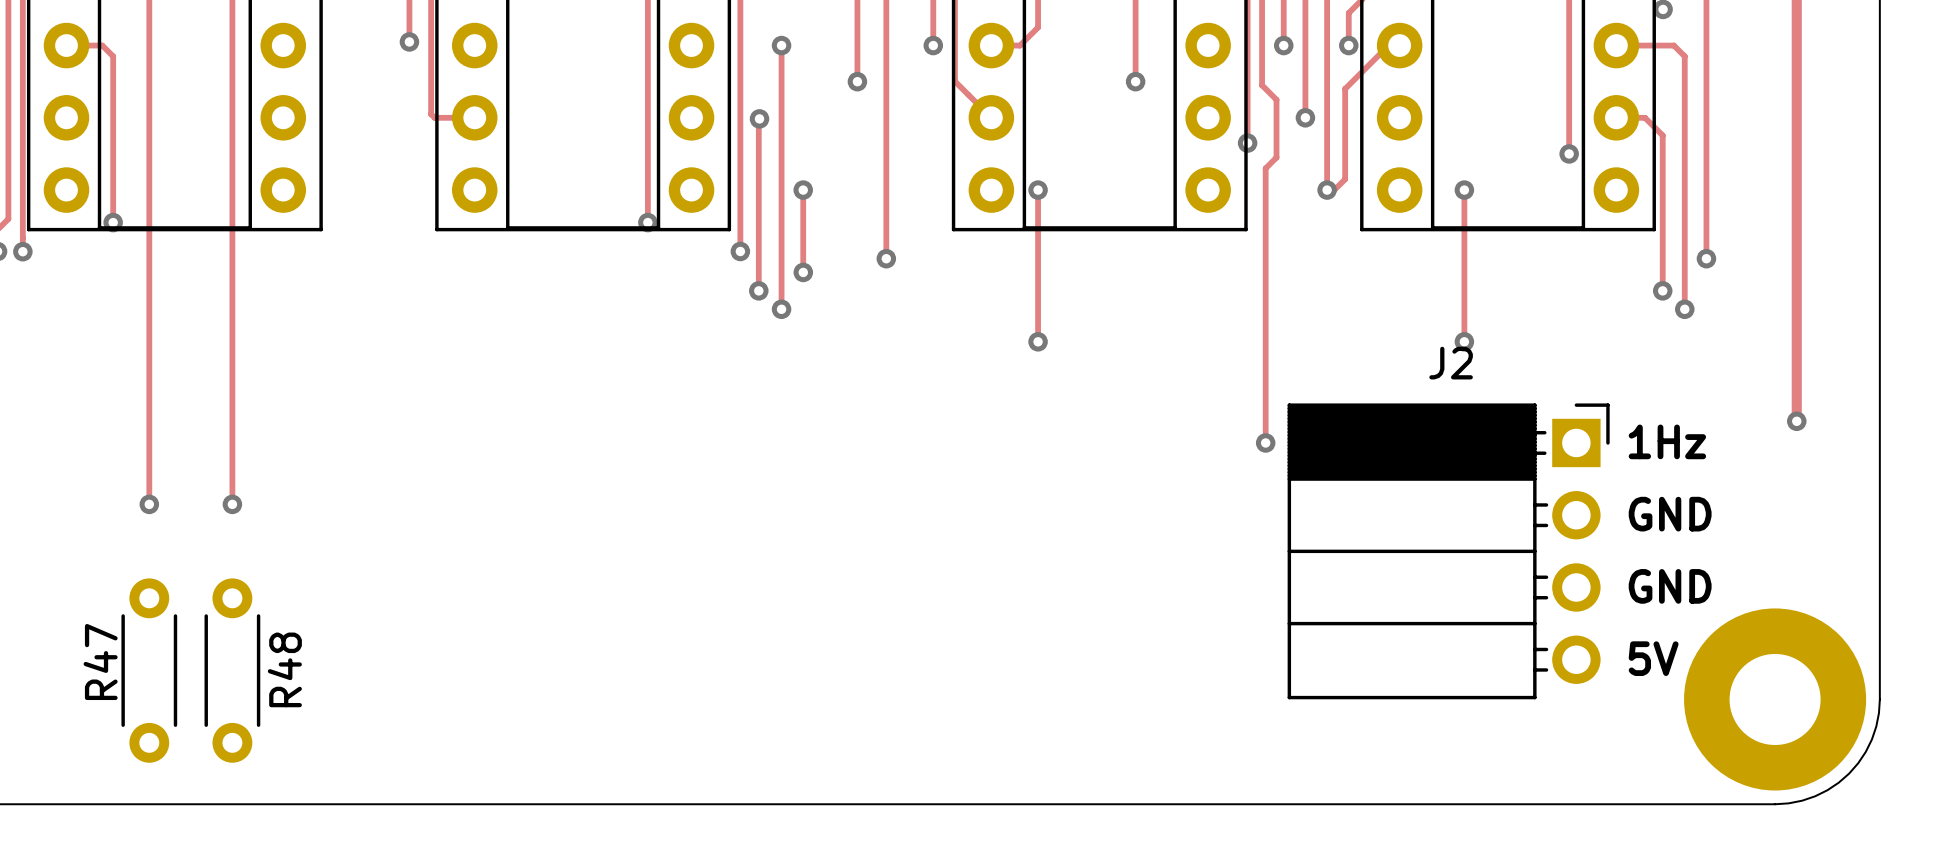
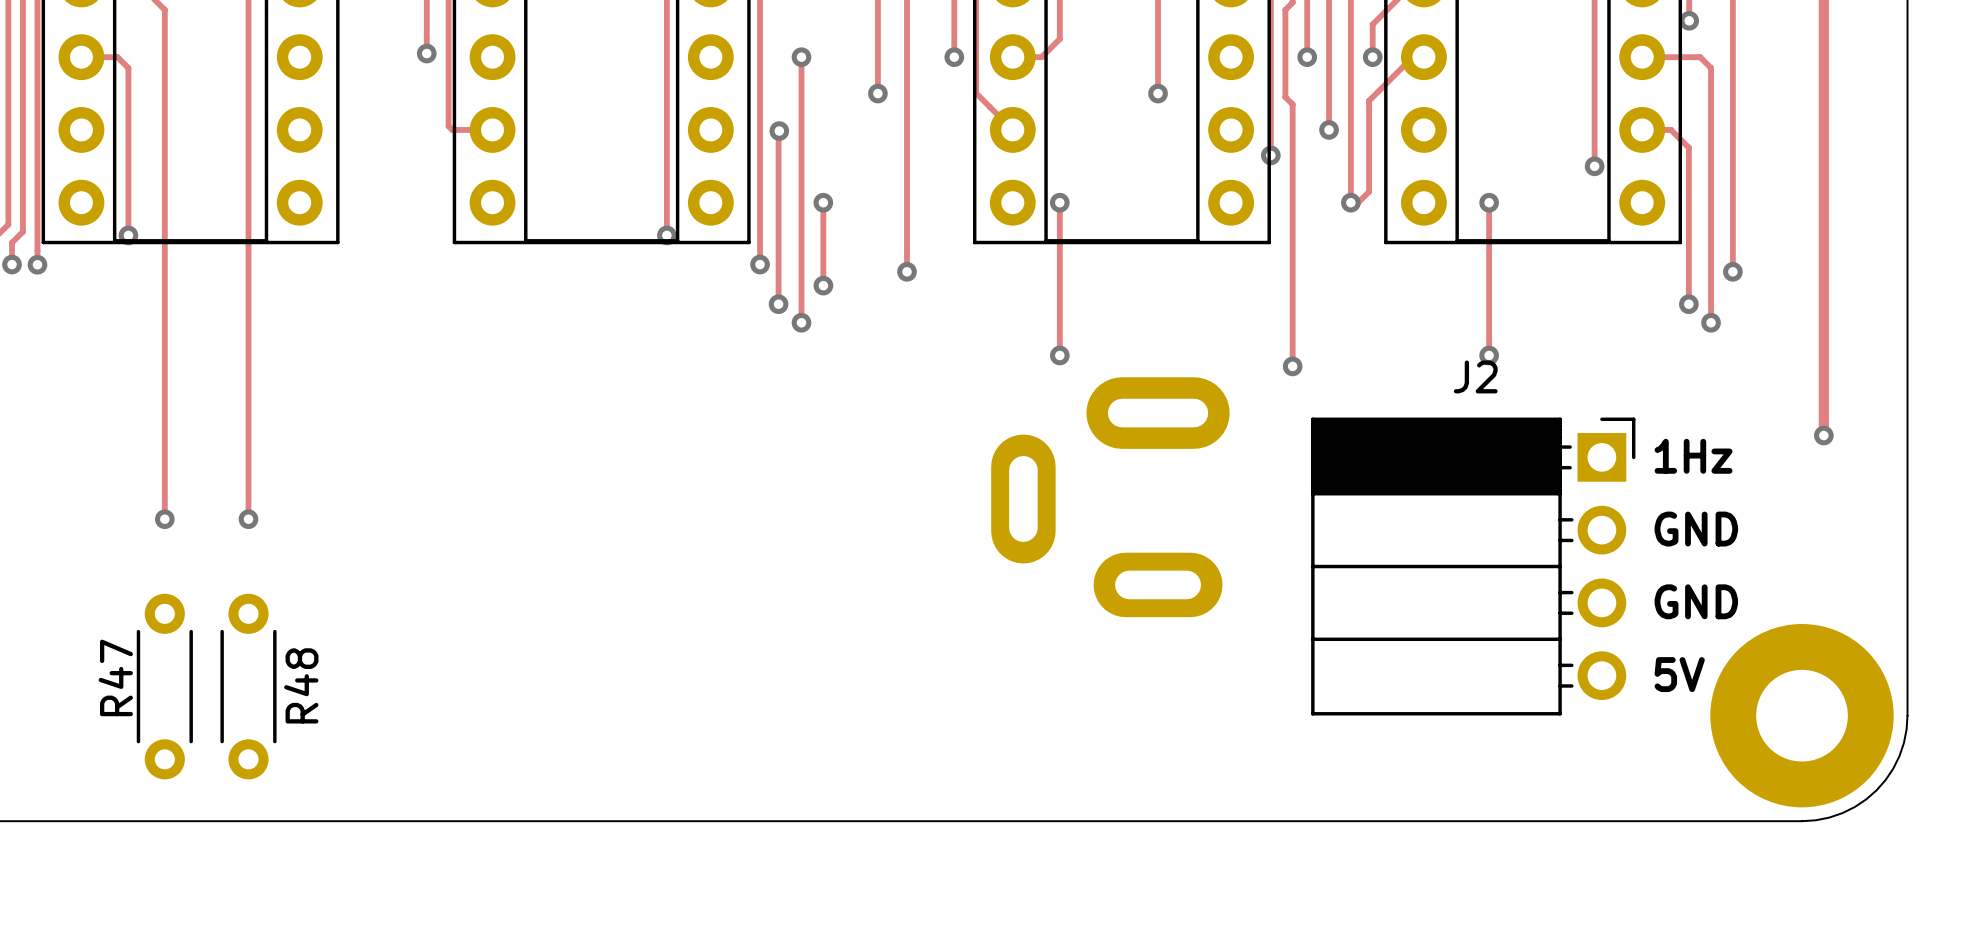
track: (1269, 92) (1276, 99) (1276, 157) (1265, 168) (1265, 442) -> (1292, 104) (1292, 366)
via position: (1265, 442) -> (1292, 366)
part: none -> (1110, 497)

